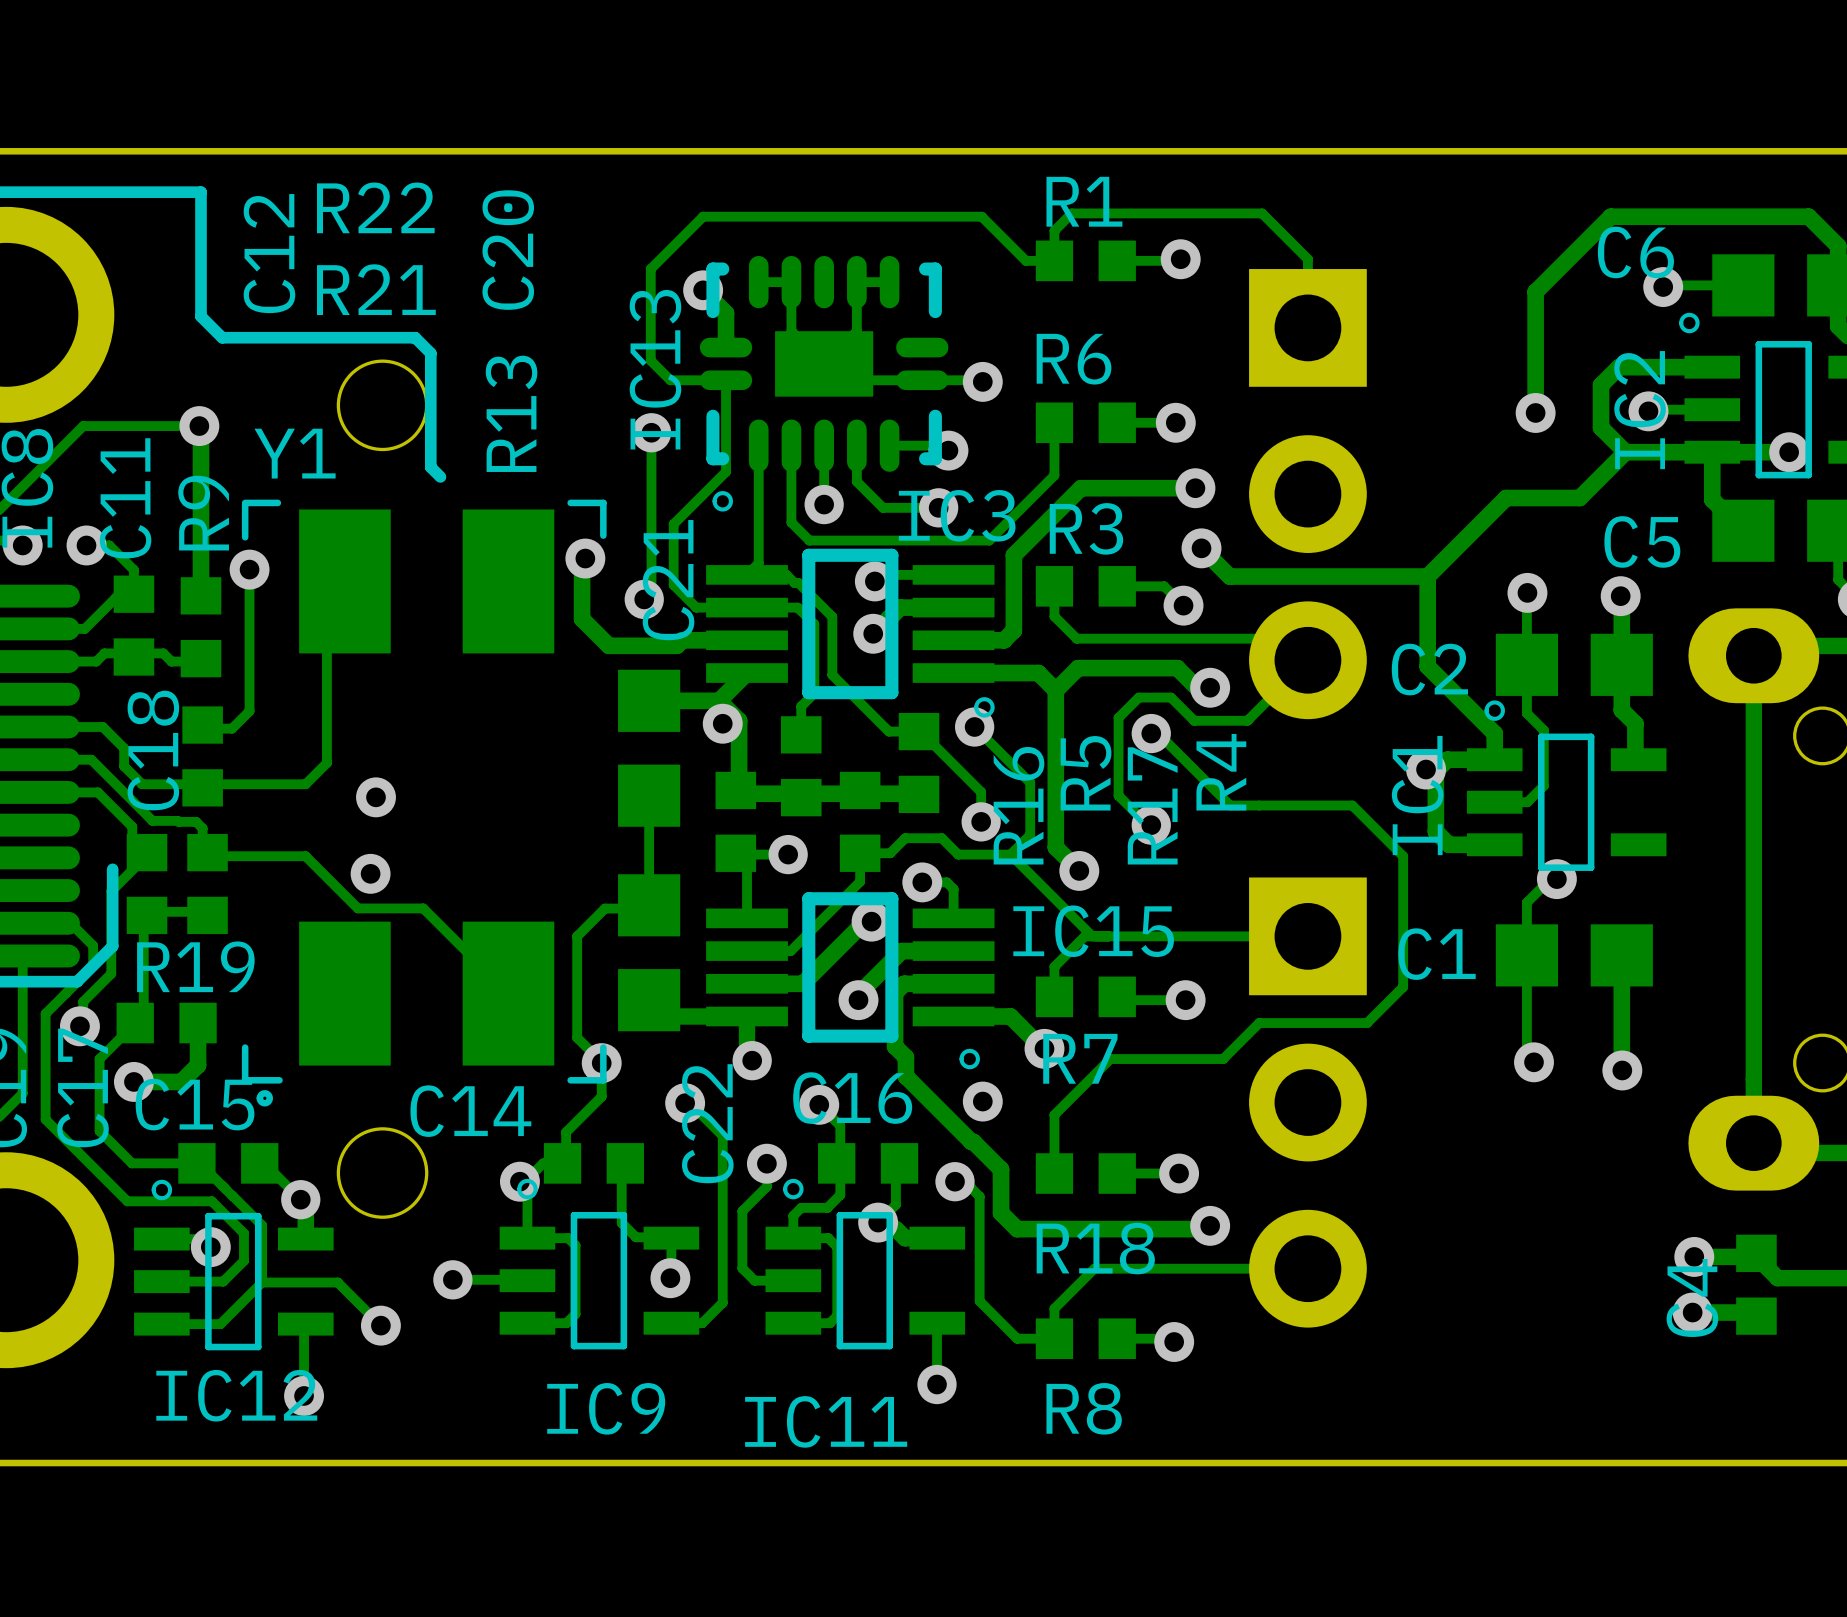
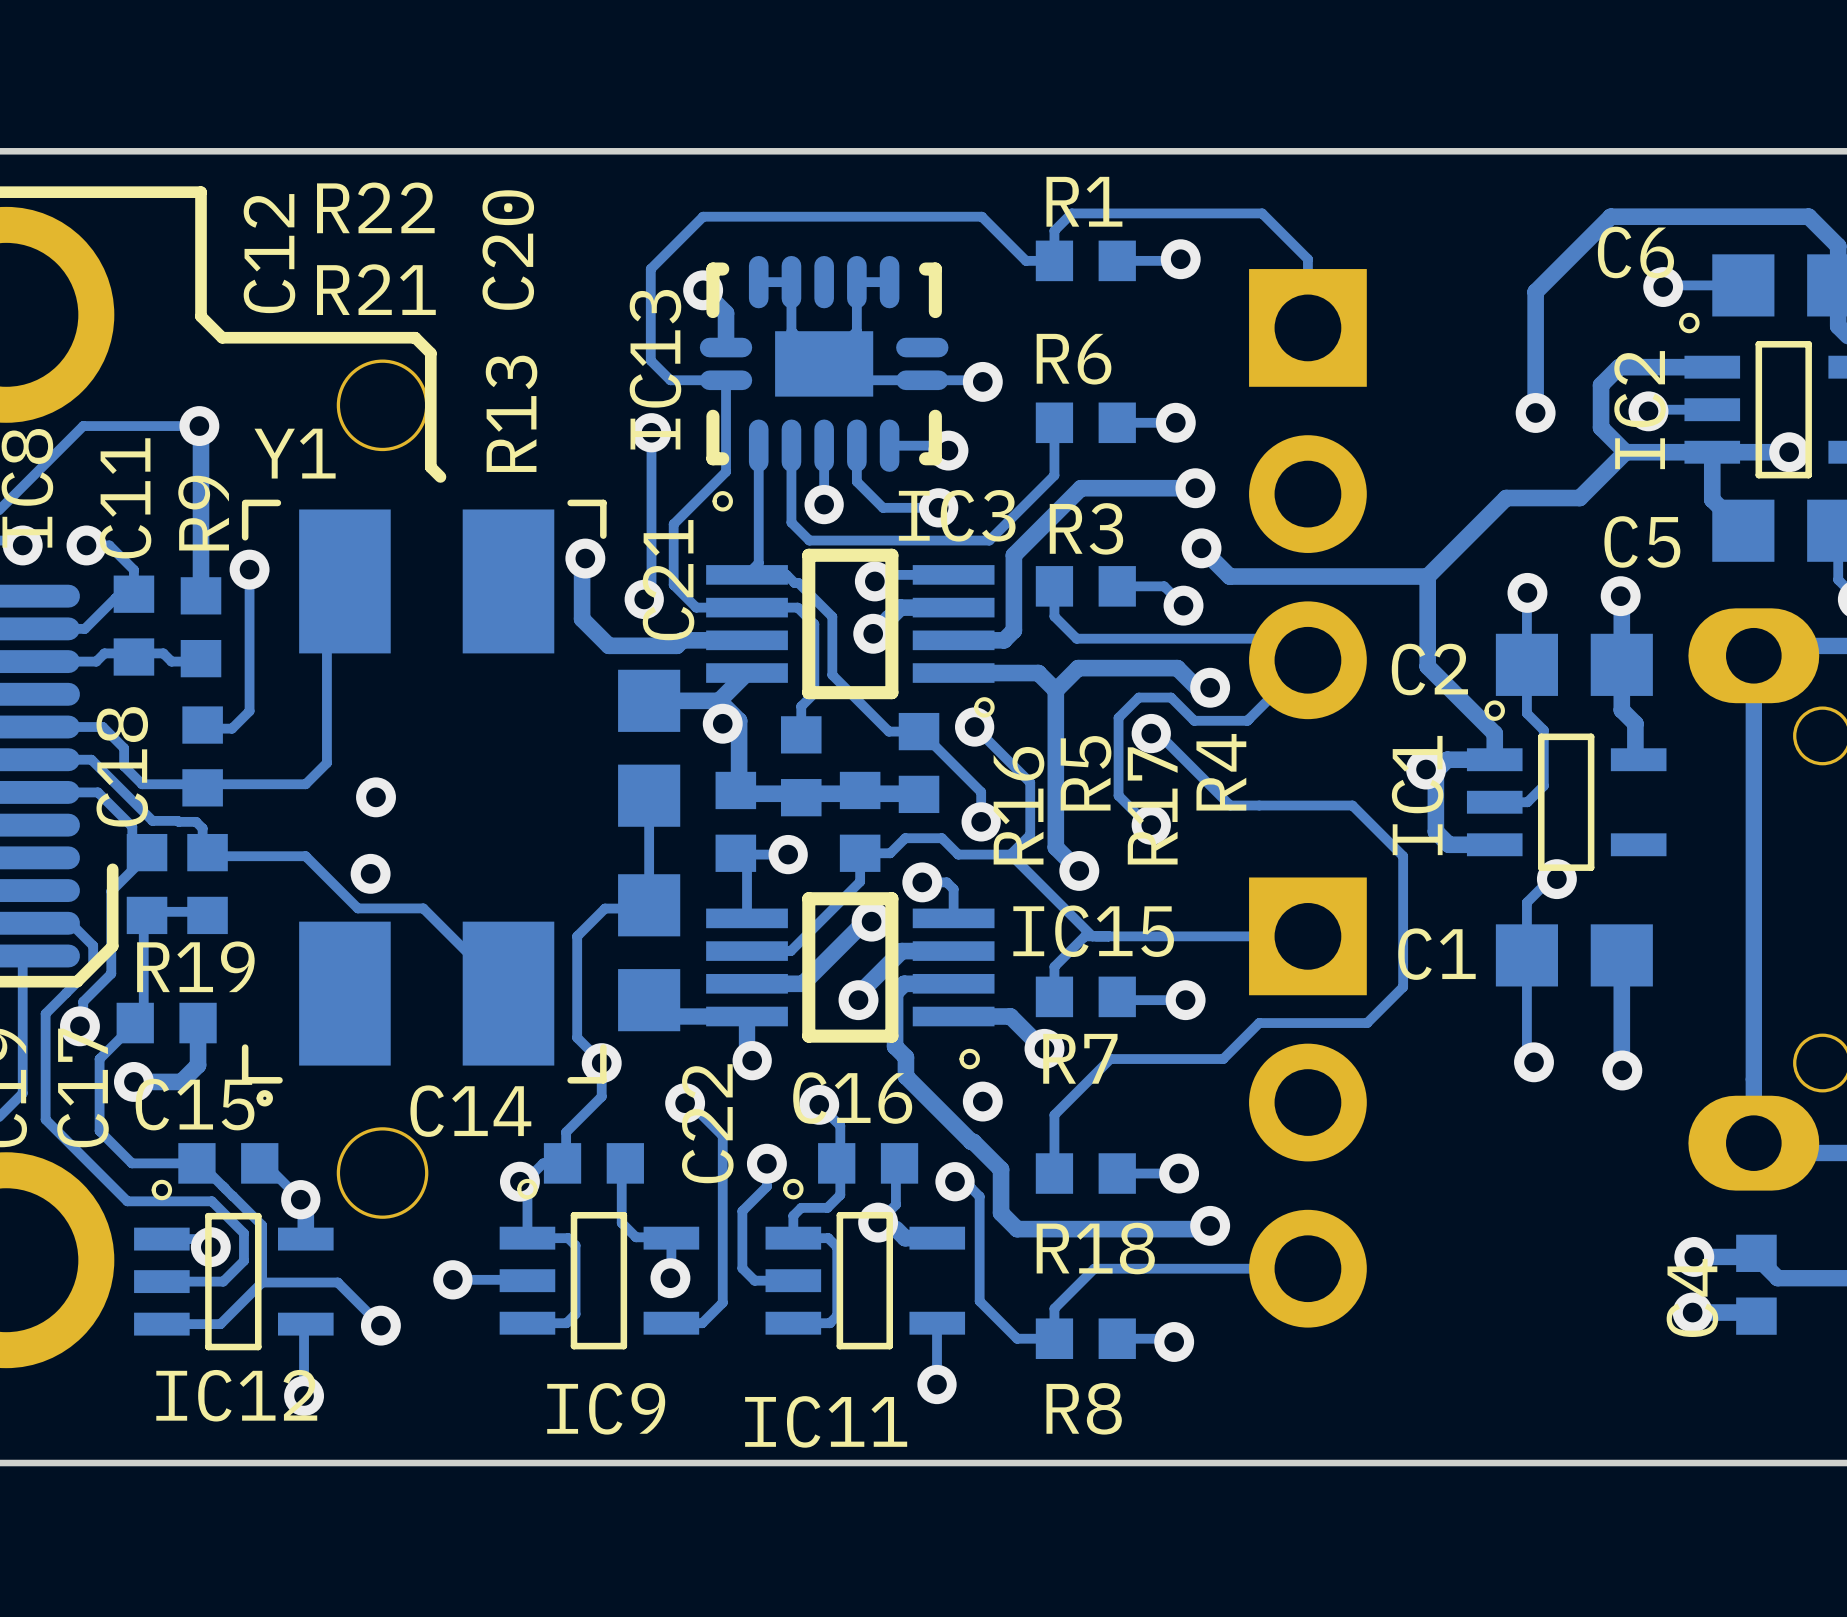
text position: C18 (153, 750) -> C18 (122, 766)

